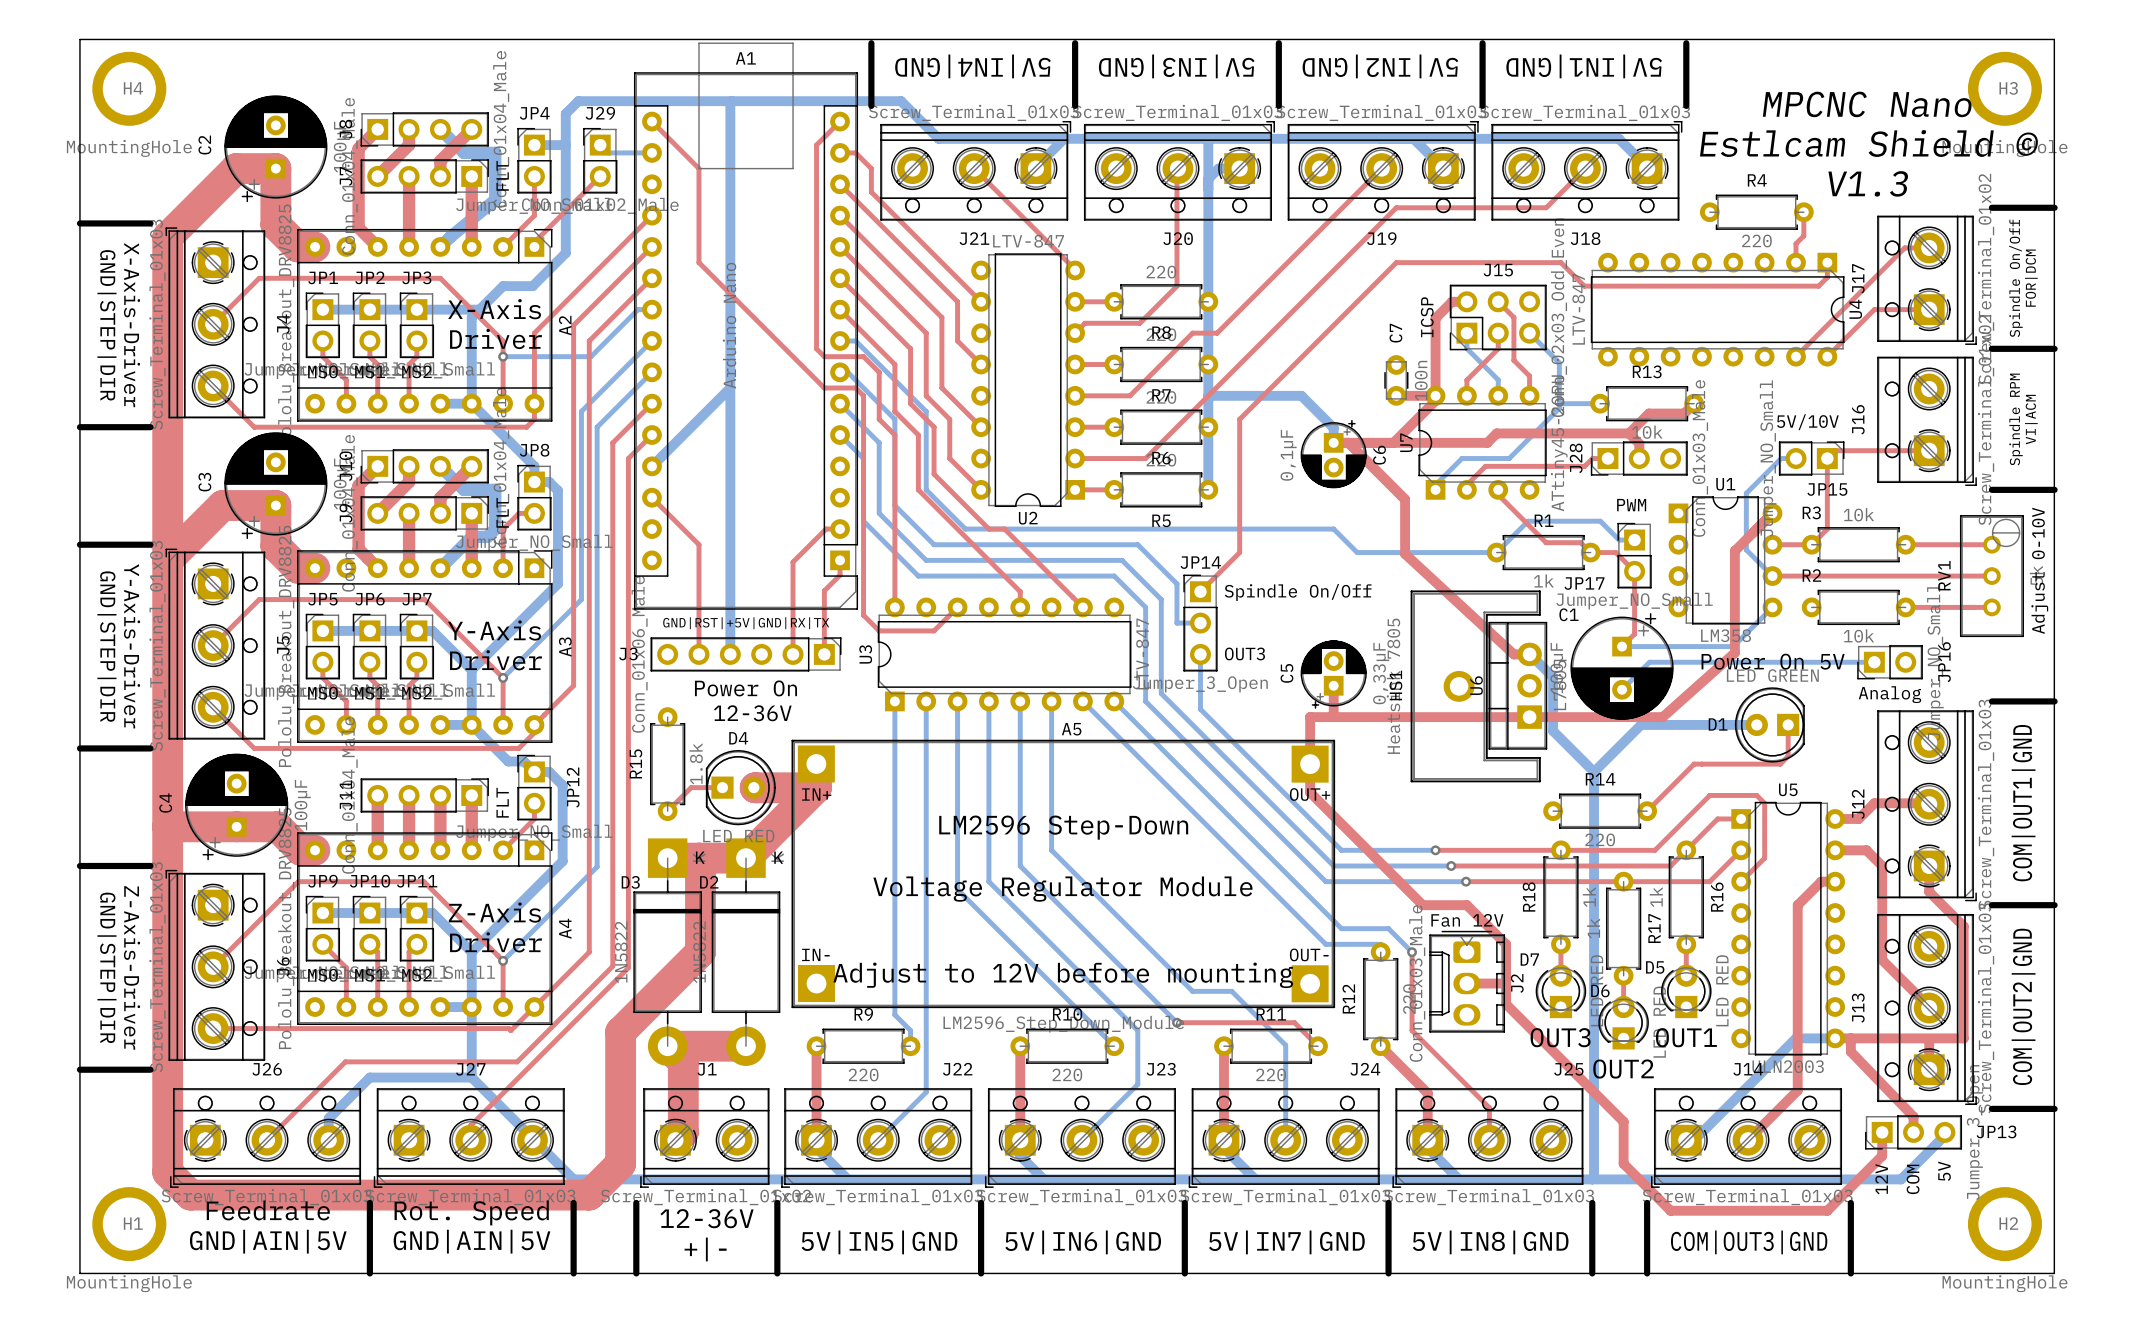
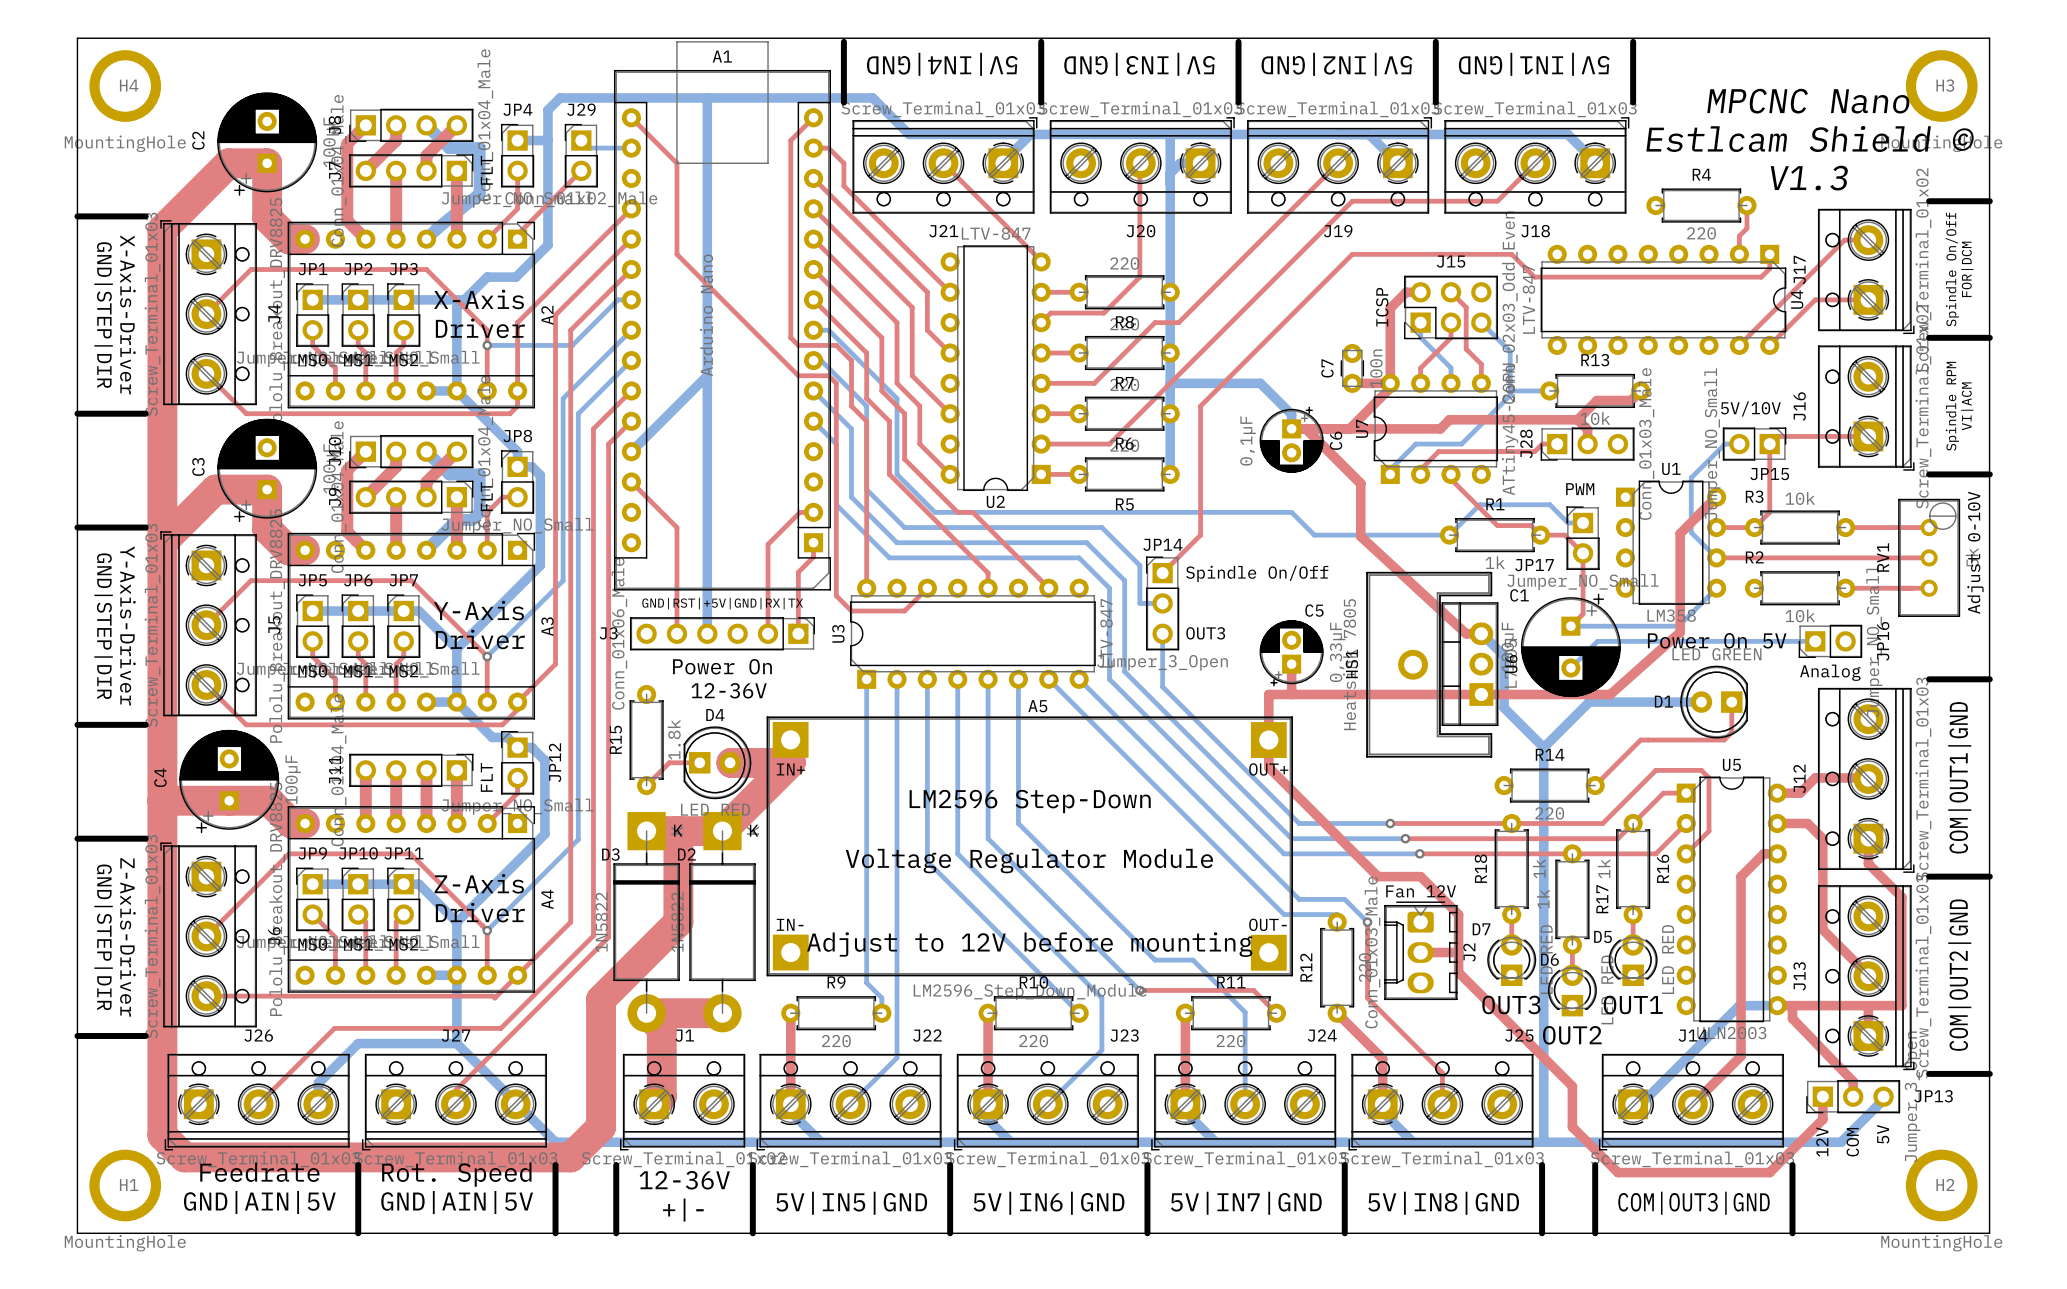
C7 name position: C7 (1395, 333) -> C7 (1327, 368)
C5 name rotation: 0° (1286, 673) -> 90° clockwise (1314, 610)
C5 name position: C5 (1286, 673) -> C5 (1314, 610)
U6 name position: U6 (1476, 685) -> U6 (1511, 664)

